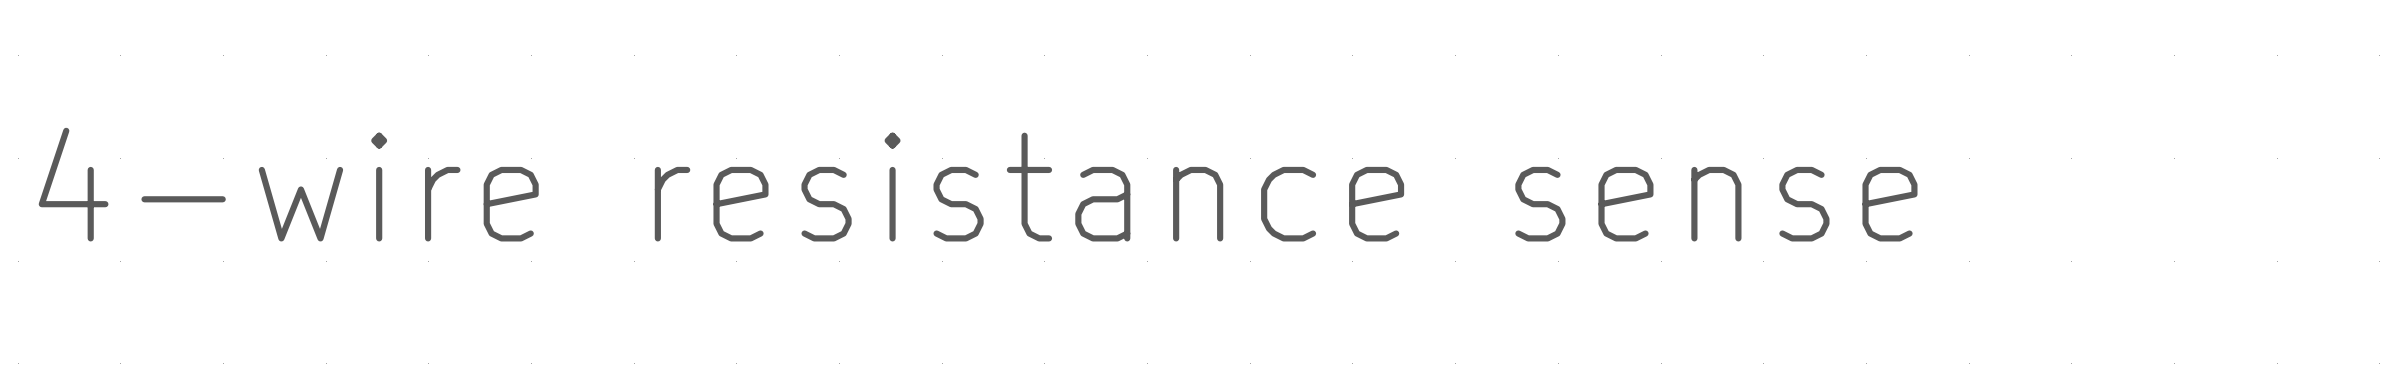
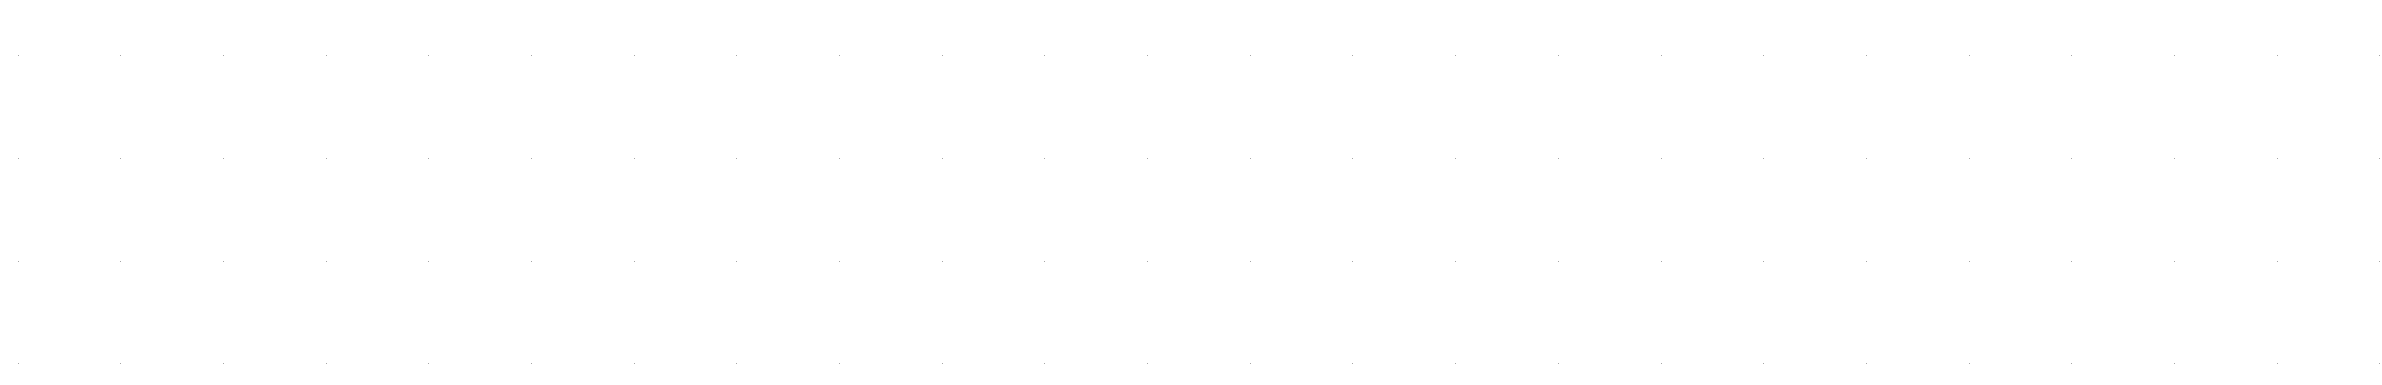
text: 4-wire resistance sense (978, 184) -> none

